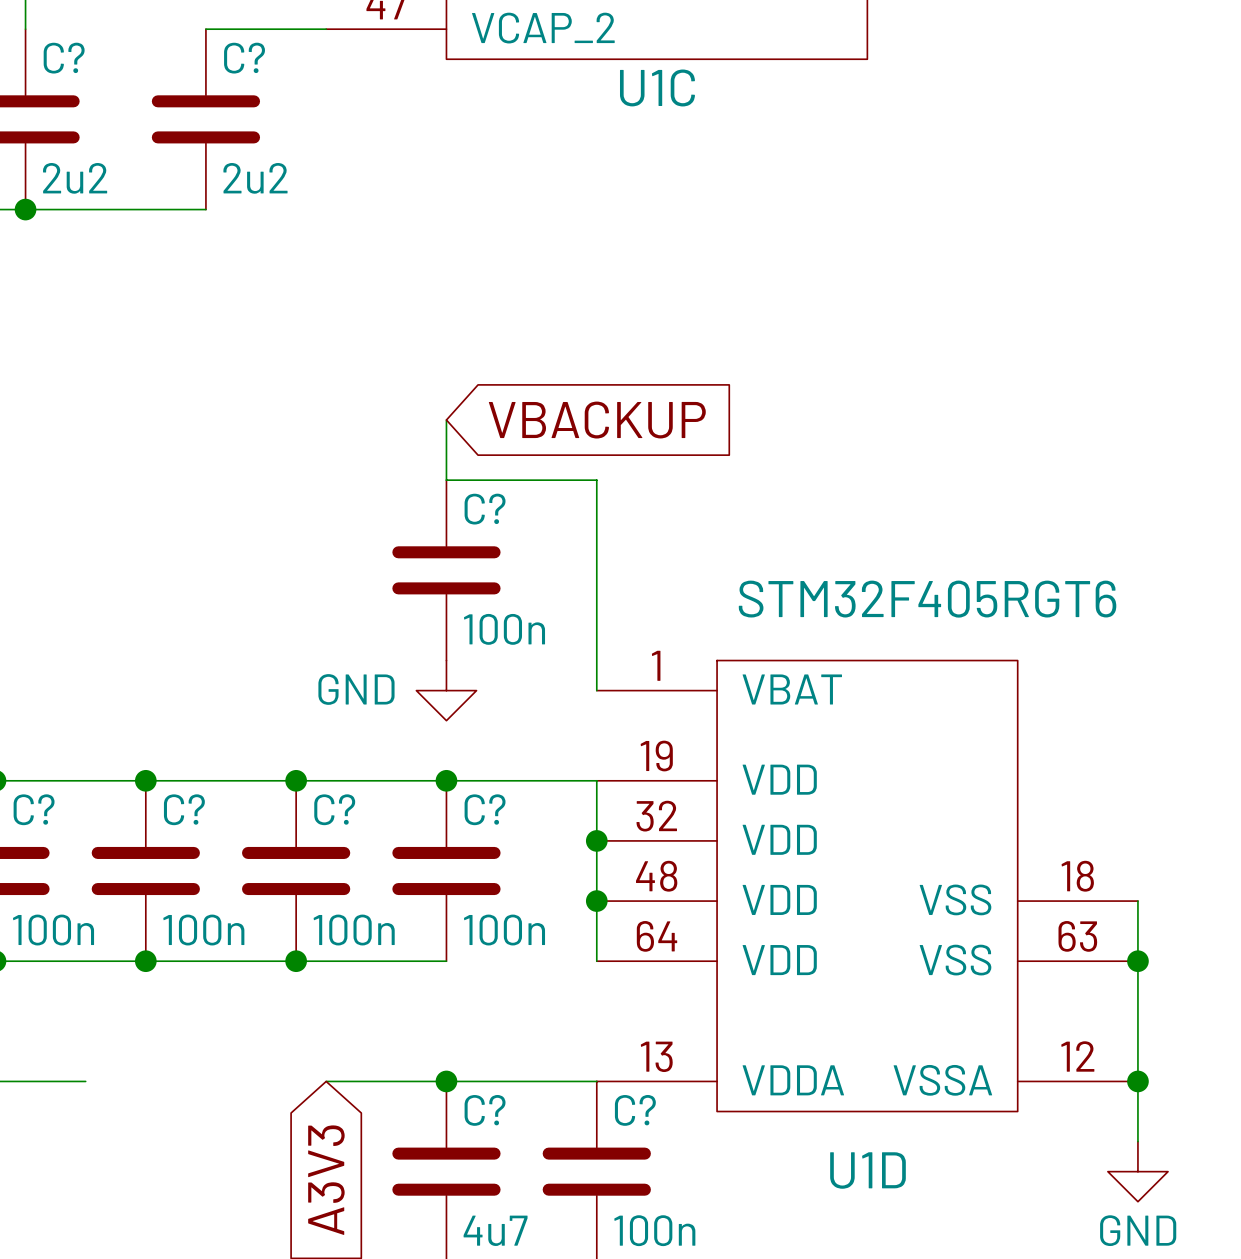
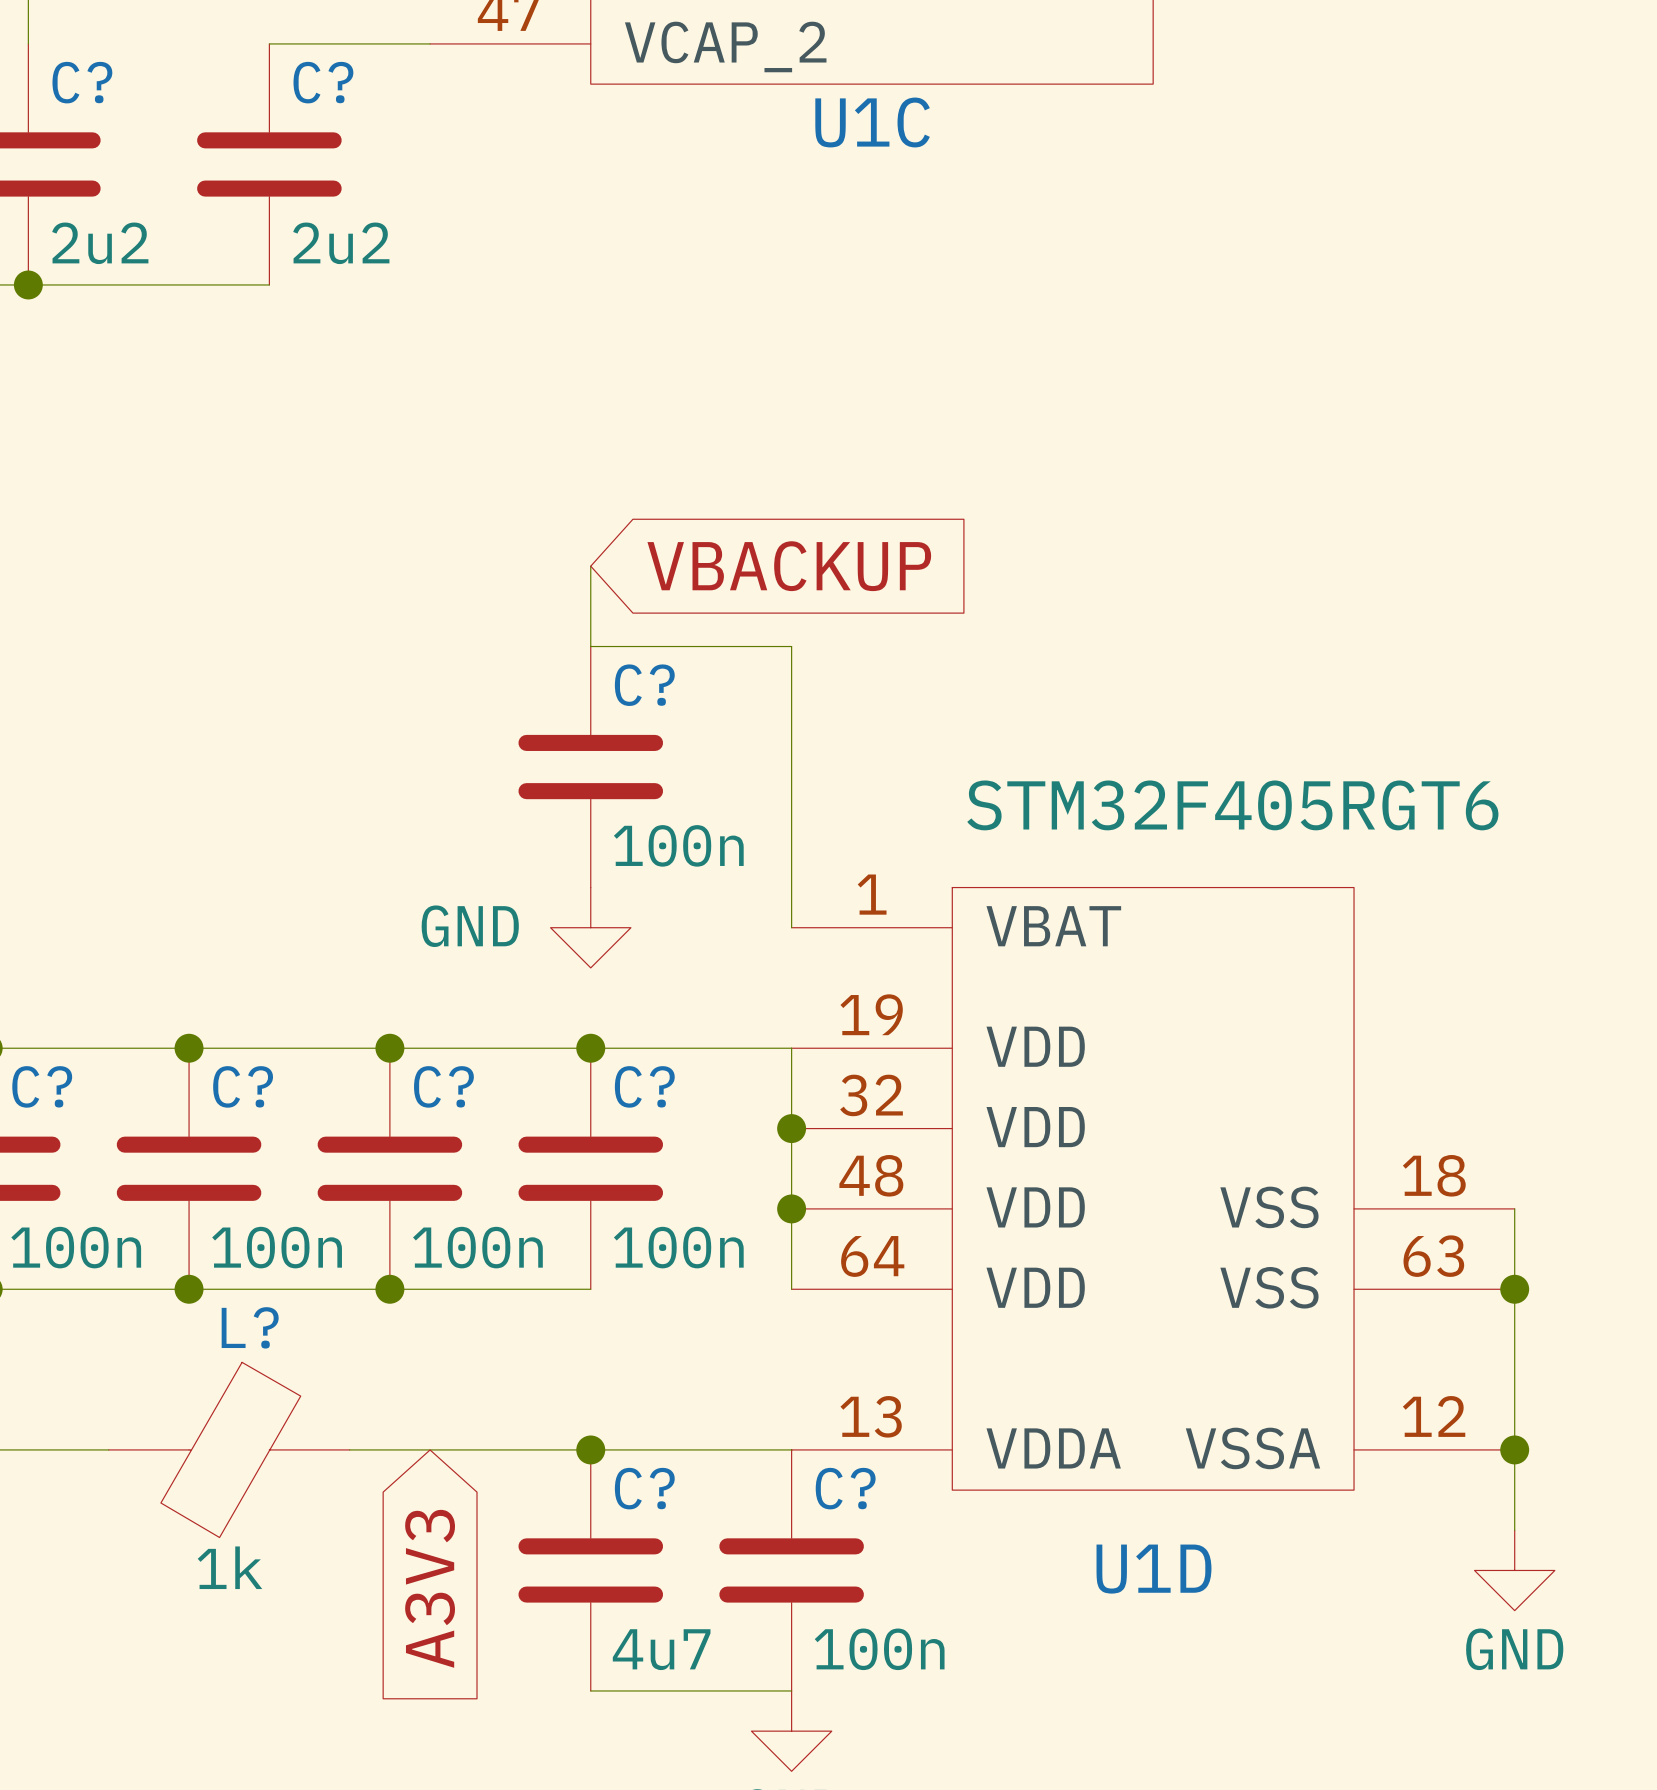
L?: none -> 1k (229, 1449)
wire: none -> (349, 1449) (430, 1449)

